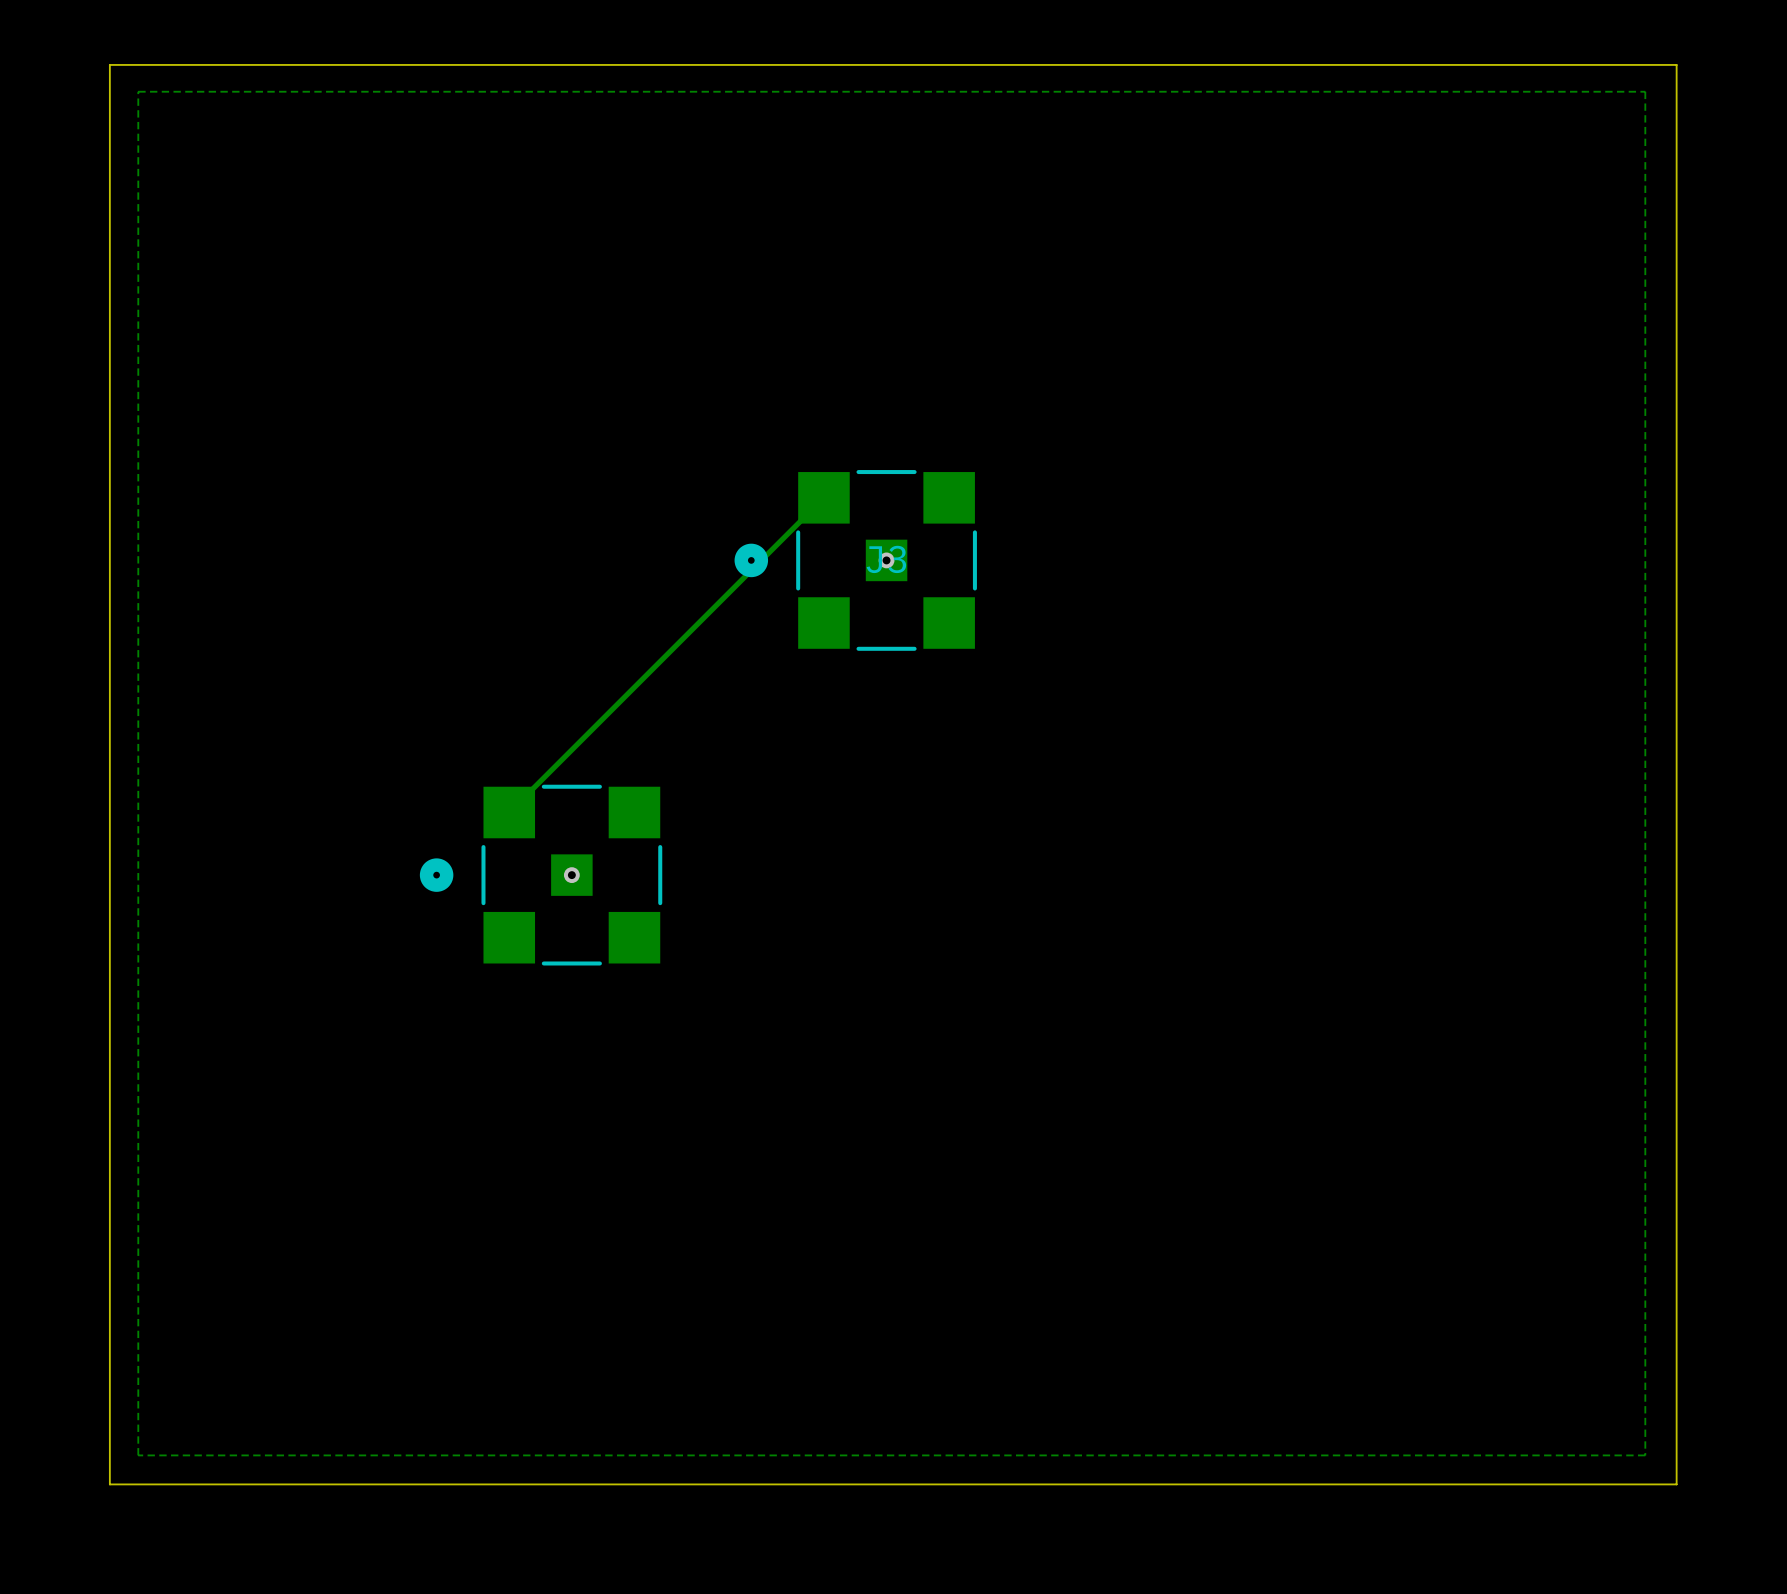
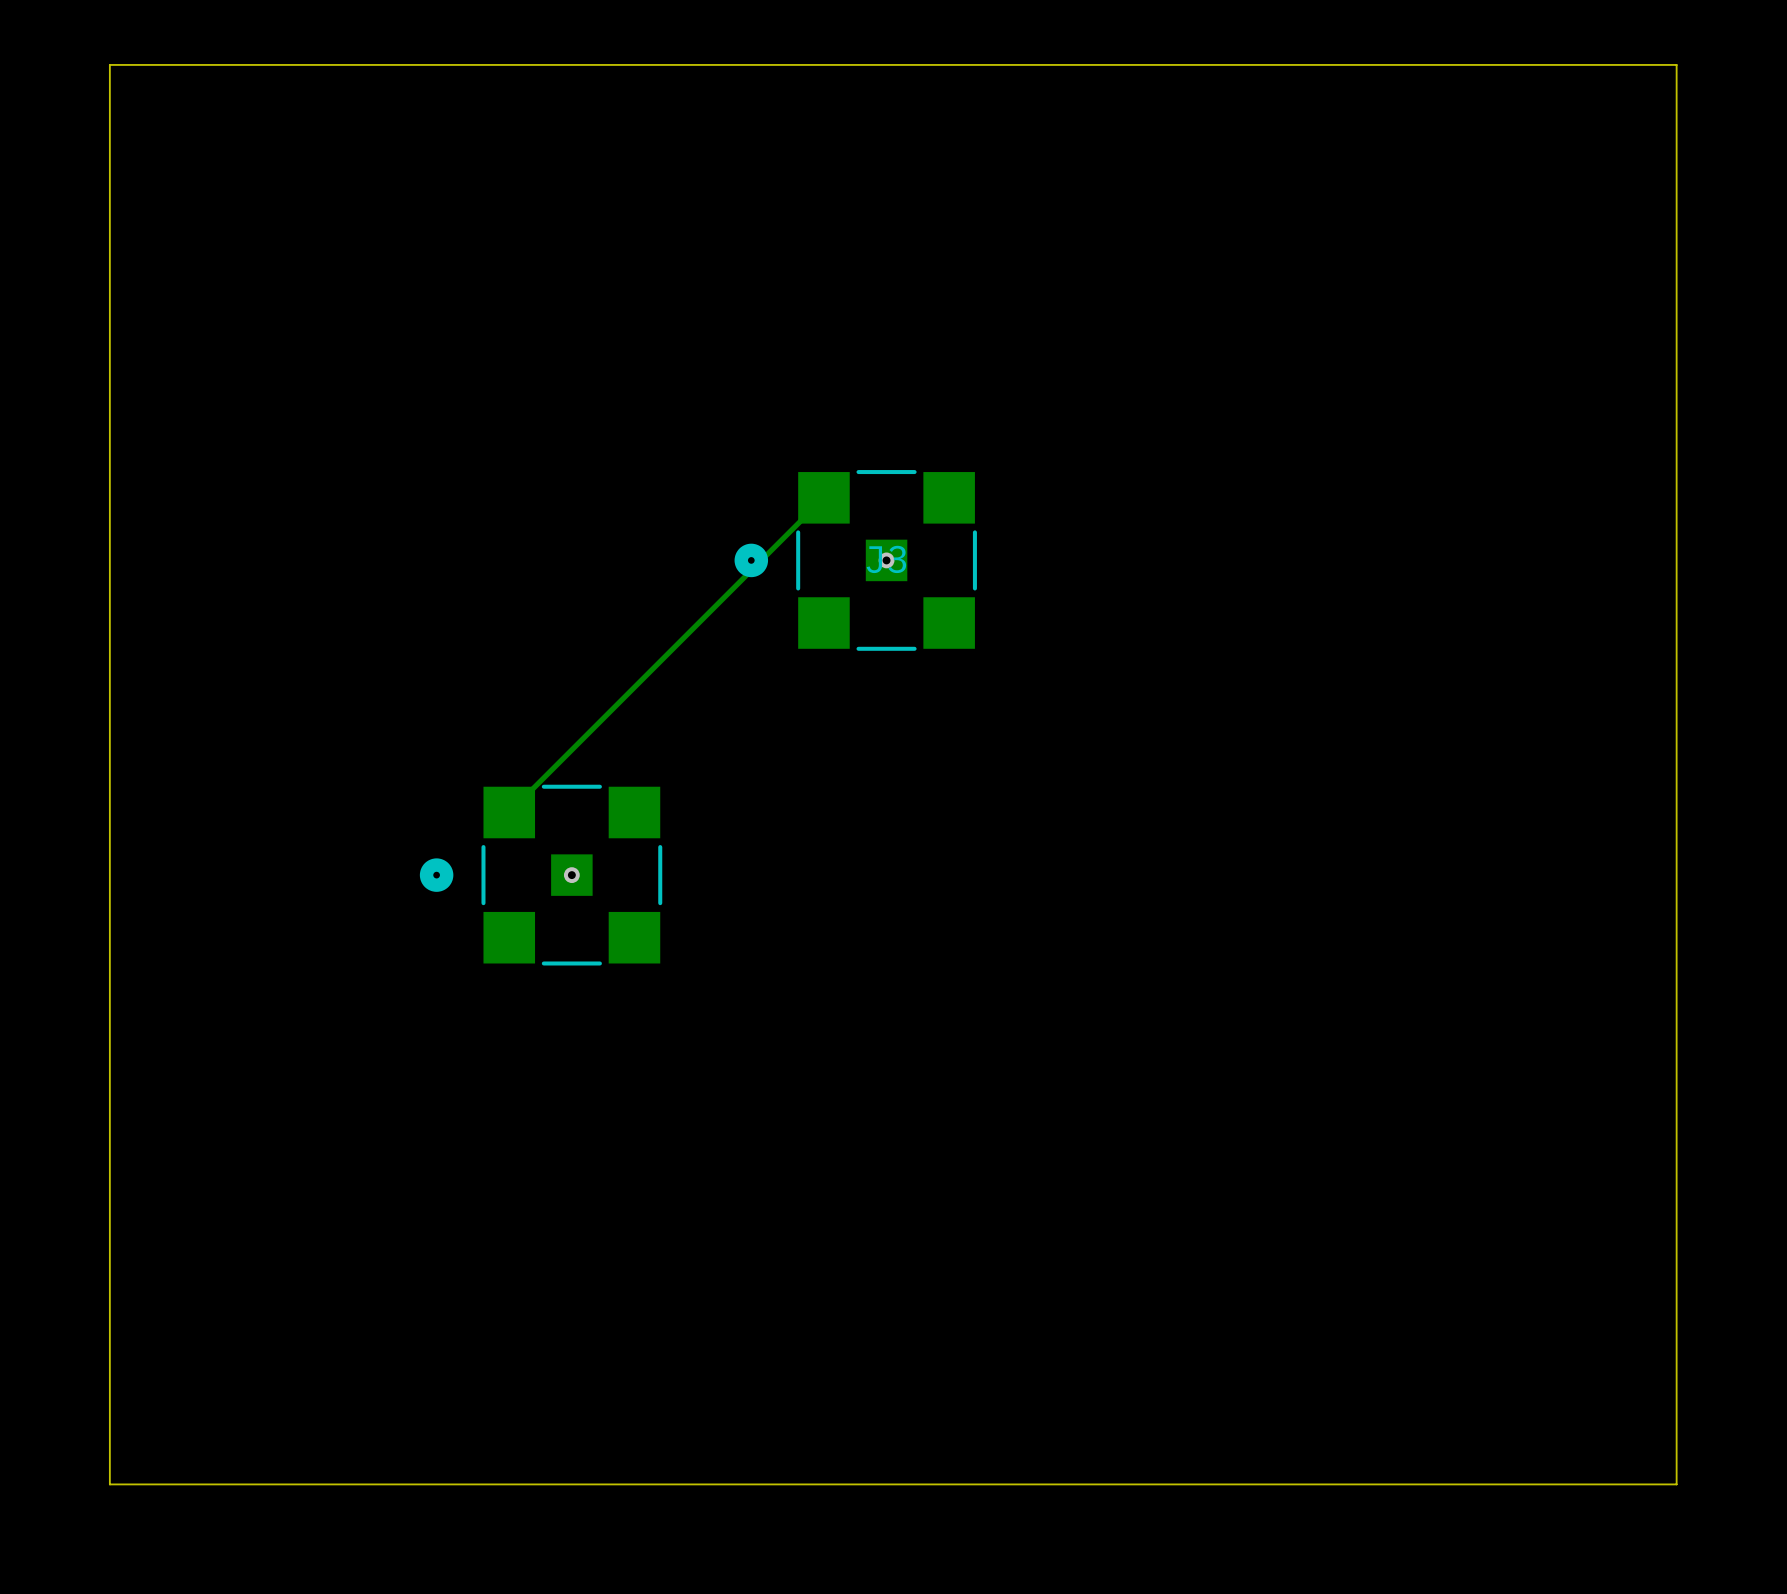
zone outline: (1645, 91) (138, 91) (138, 1455) (1645, 1455) (1645, 91) -> none

